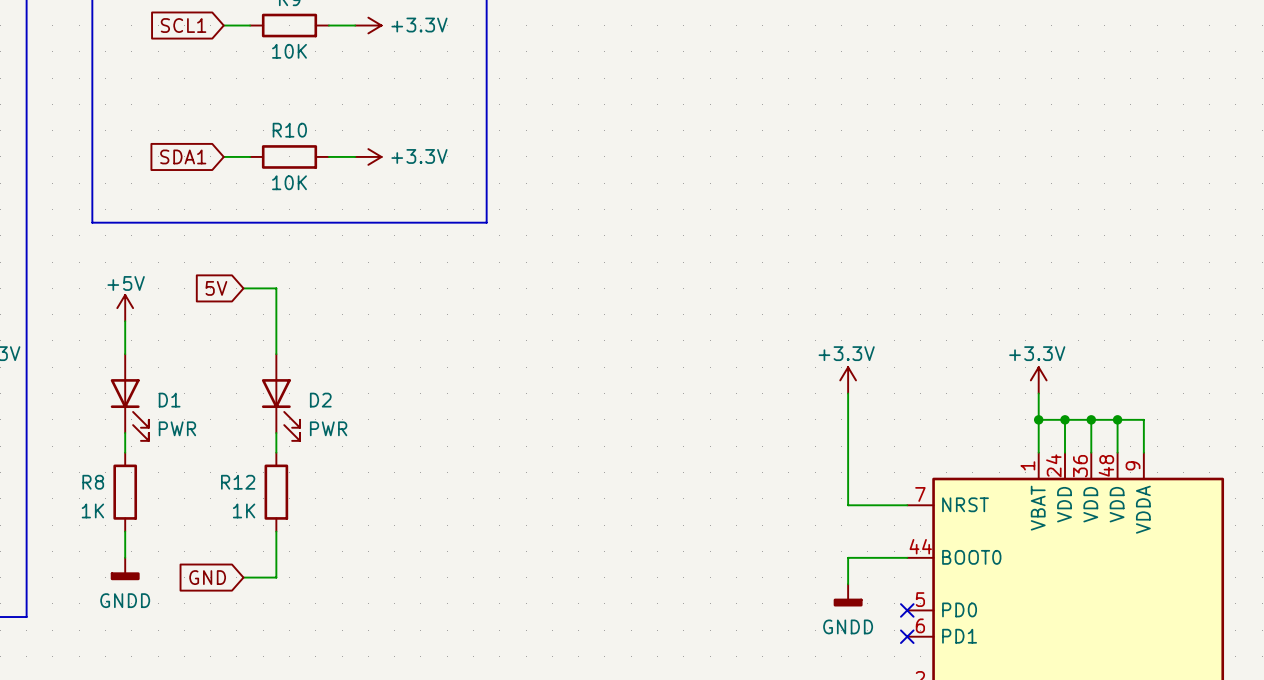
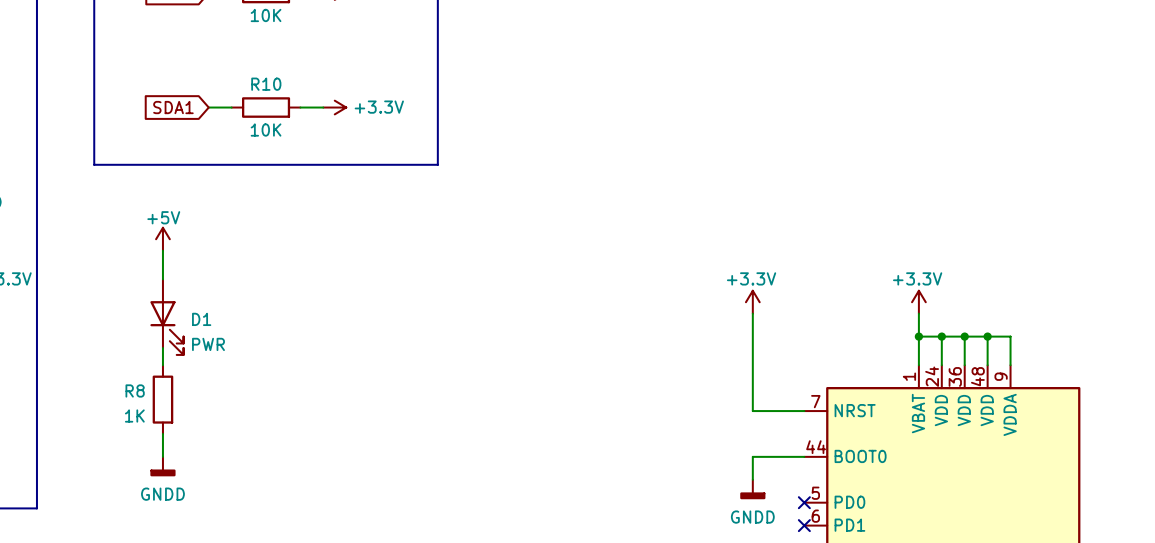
global label: 5V (216, 288) -> none
wire: (243, 288) (276, 288) (276, 354) -> none
power symbol position: +5V (125, 308) -> +5V (162, 239)
wire: (125, 321) (125, 354) -> (162, 250) (162, 279)
D1 position: (129, 397) -> (166, 317)
D2: PWR (280, 397) -> none
wire: (125, 432) (125, 452) -> (162, 348) (162, 365)
wire: (276, 432) (276, 452) -> none
R8 position: (125, 492) -> (162, 399)
R12: 1K (276, 492) -> none
wire: (125, 531) (125, 557) -> (162, 433) (162, 456)
wire: (276, 531) (276, 577) (243, 577) -> none
power symbol position: GNDD (125, 569) -> GNDD (162, 466)
global label: GND (207, 577) -> none

